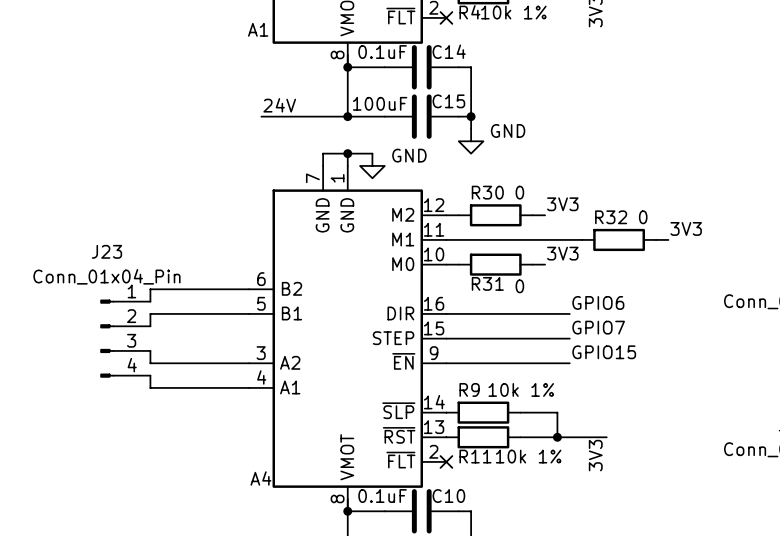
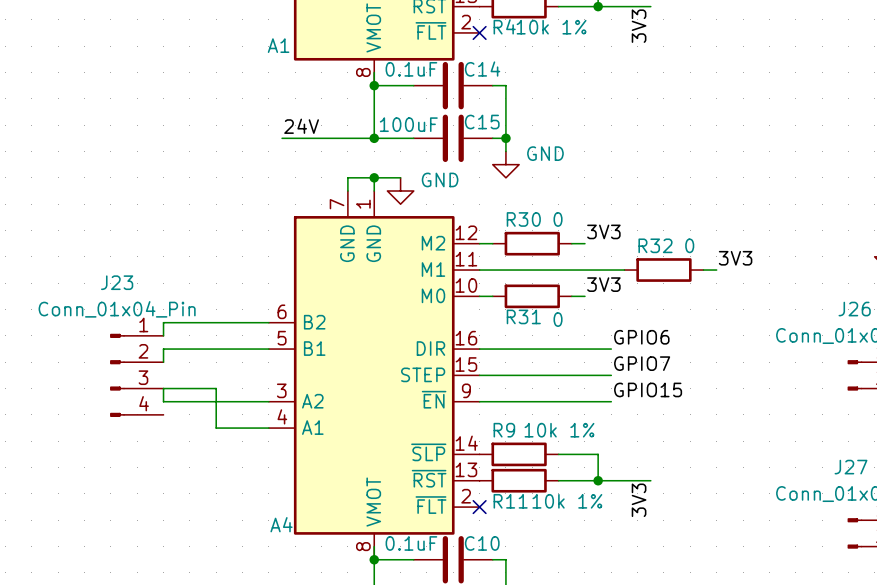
wire: (150, 375) (150, 387) (199, 387) -> (163, 388) (216, 388) (216, 428)

